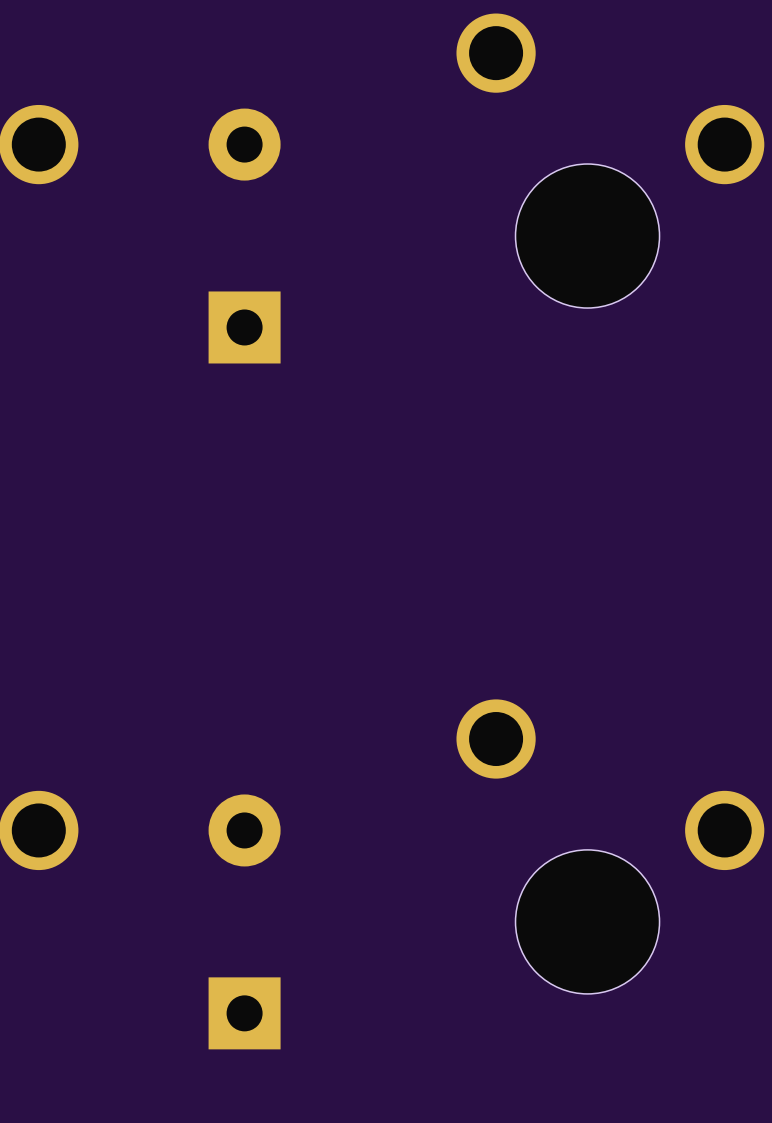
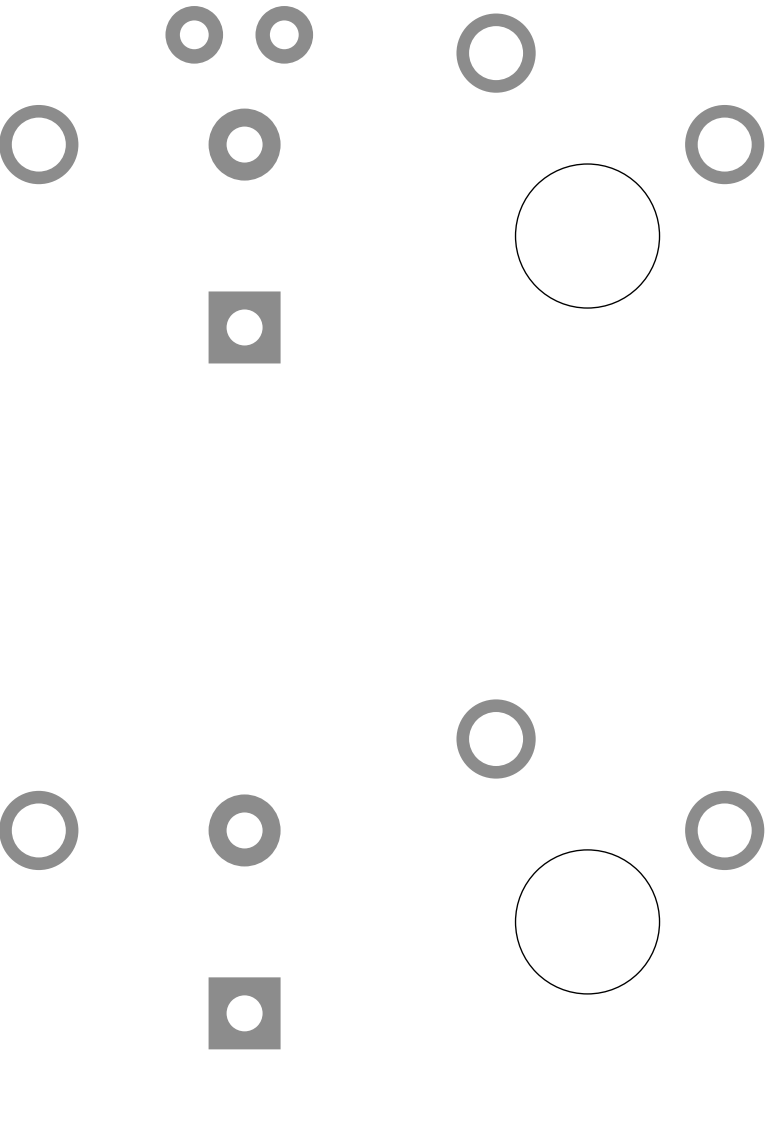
part: none -> (239, 34)

